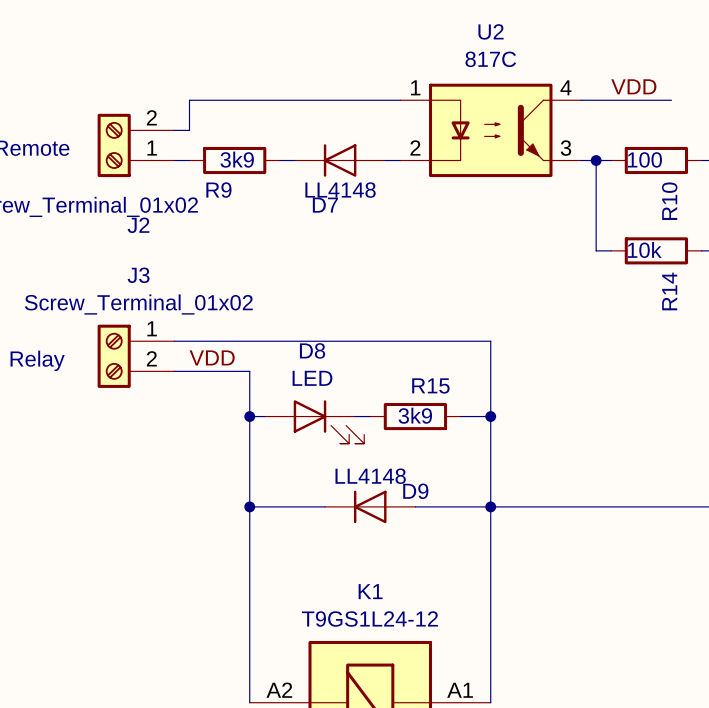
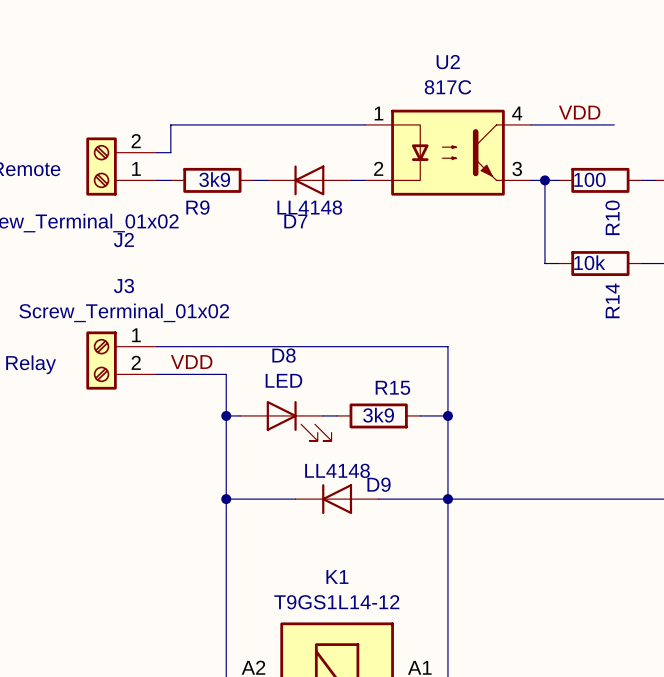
K1 value: T9GS1L24-12 (369, 619) -> T9GS1L14-12 (336, 602)

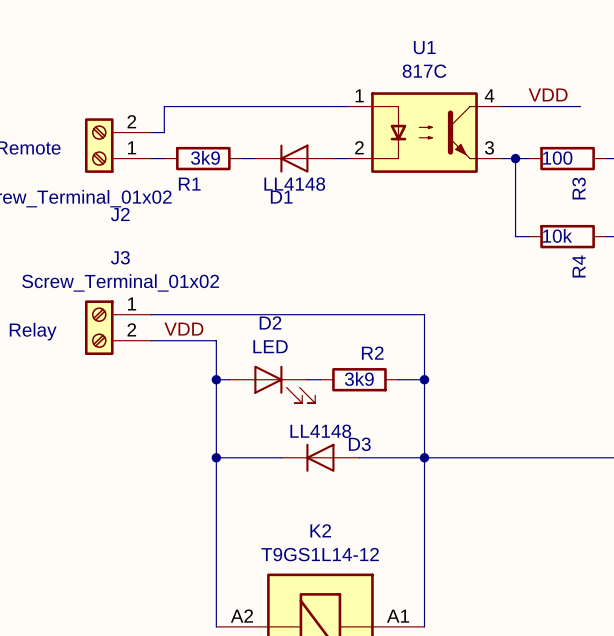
U2 name: U2 (448, 62) -> U1 (424, 47)
R9 name: R9 (197, 207) -> R1 (189, 184)
R10 name: R10 (612, 217) -> R3 (579, 188)
D7 name: D7 (295, 221) -> D1 (281, 197)
R14 name: R14 (612, 300) -> R4 (579, 266)
D8 name: D8 (284, 355) -> D2 (270, 322)
R15 name: R15 (392, 387) -> R2 (372, 353)
D9 name: D9 (379, 484) -> D3 (359, 444)
K1 name: K1 (337, 577) -> K2 (320, 530)

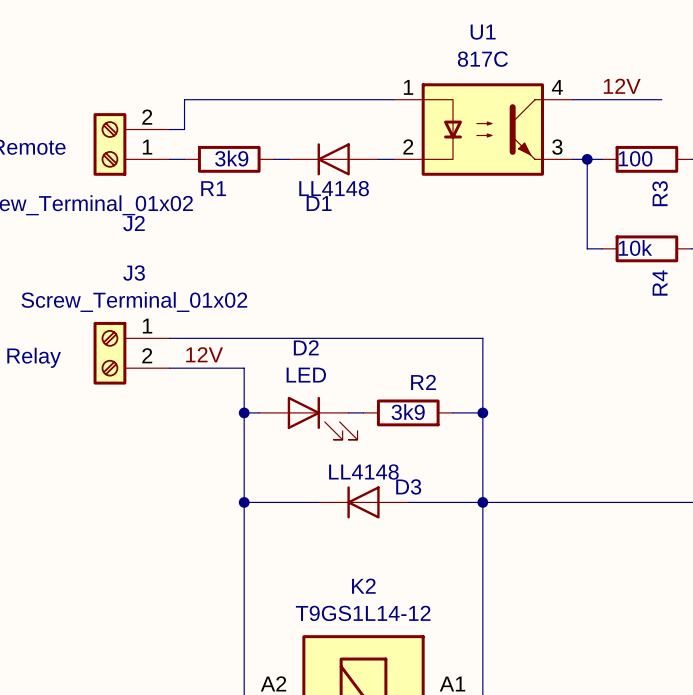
label: VDD (548, 94) -> 12V (622, 86)
label: VDD (183, 329) -> 12V (204, 354)

